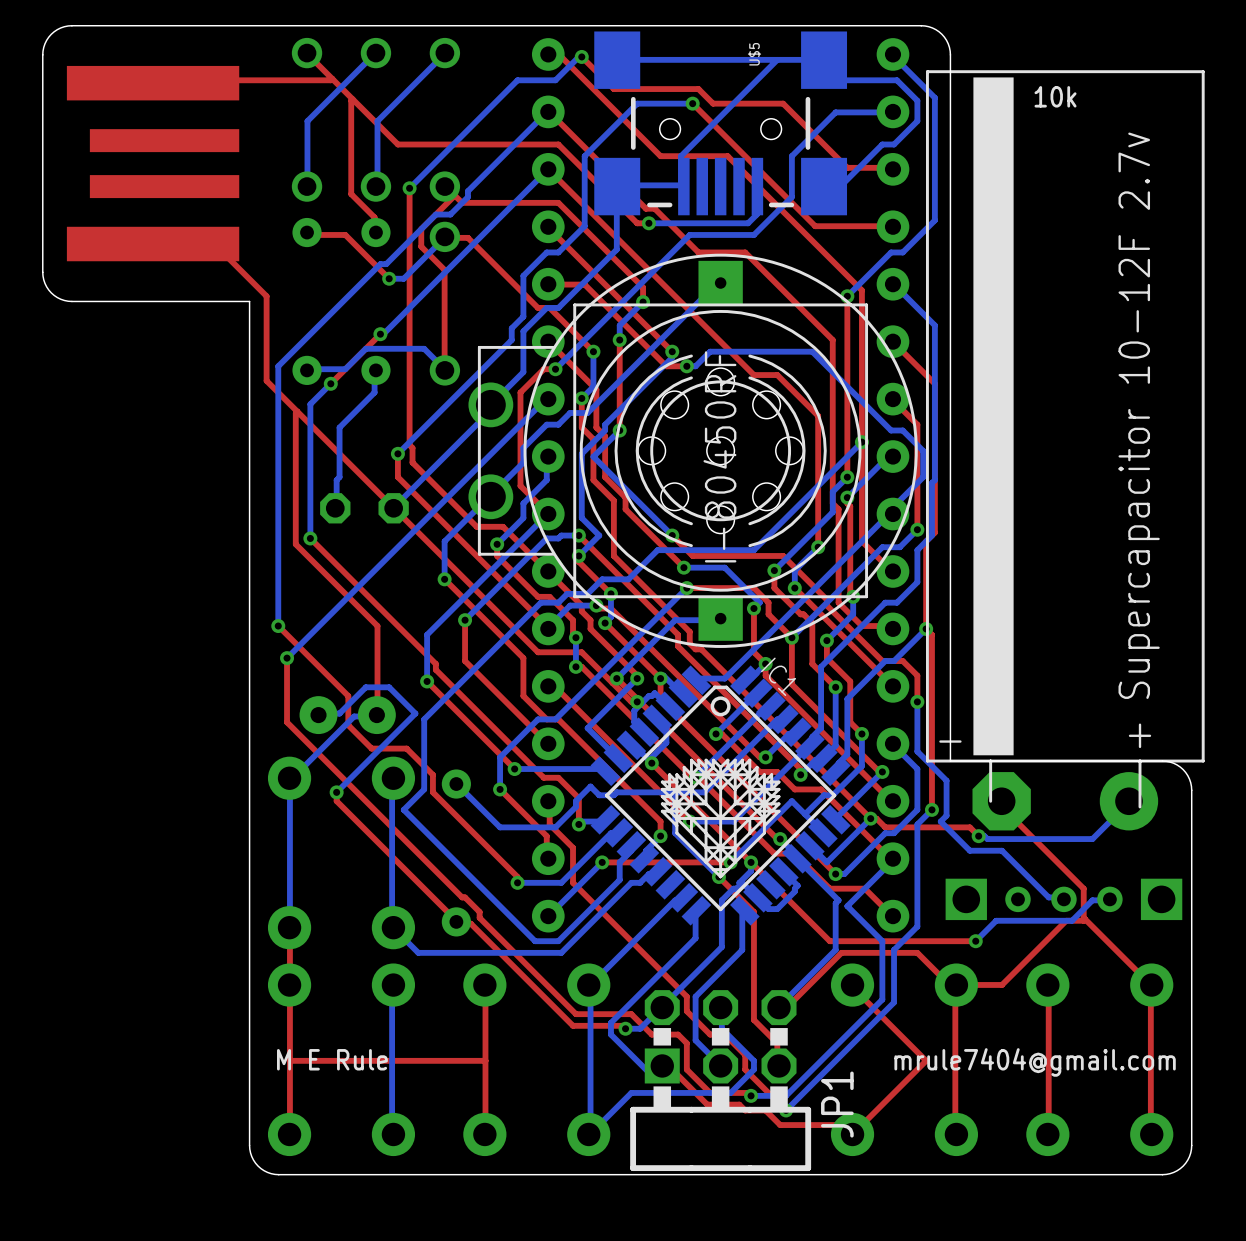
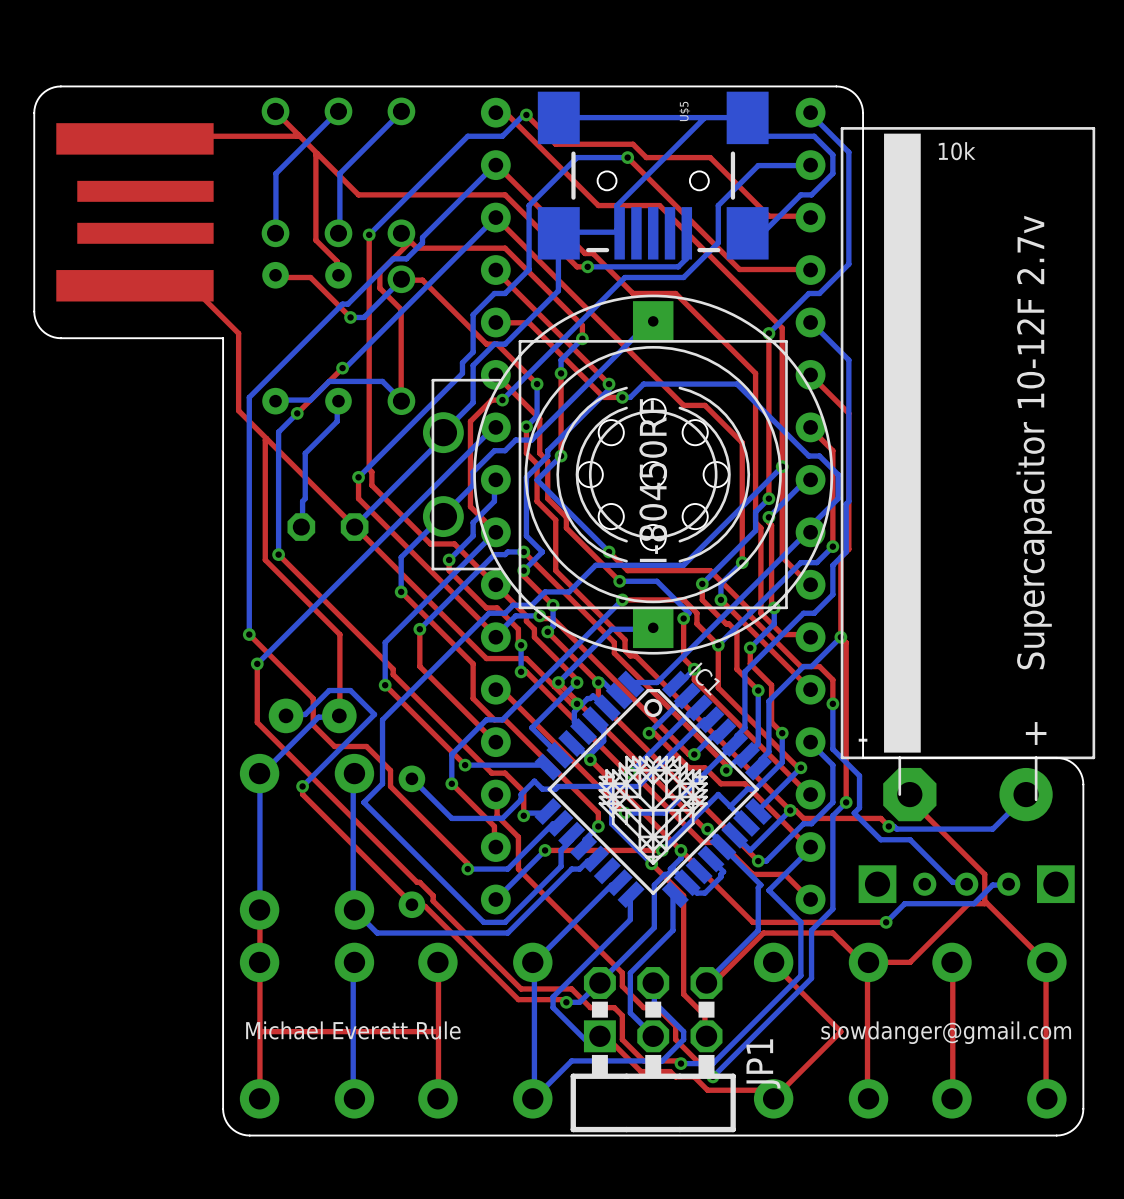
text: M E Rule (332, 1059) -> Michael Everett Rule (353, 1030)
text: mrule7404@gmail.com (1035, 1062) -> slowdanger@gmail.com (946, 1032)

